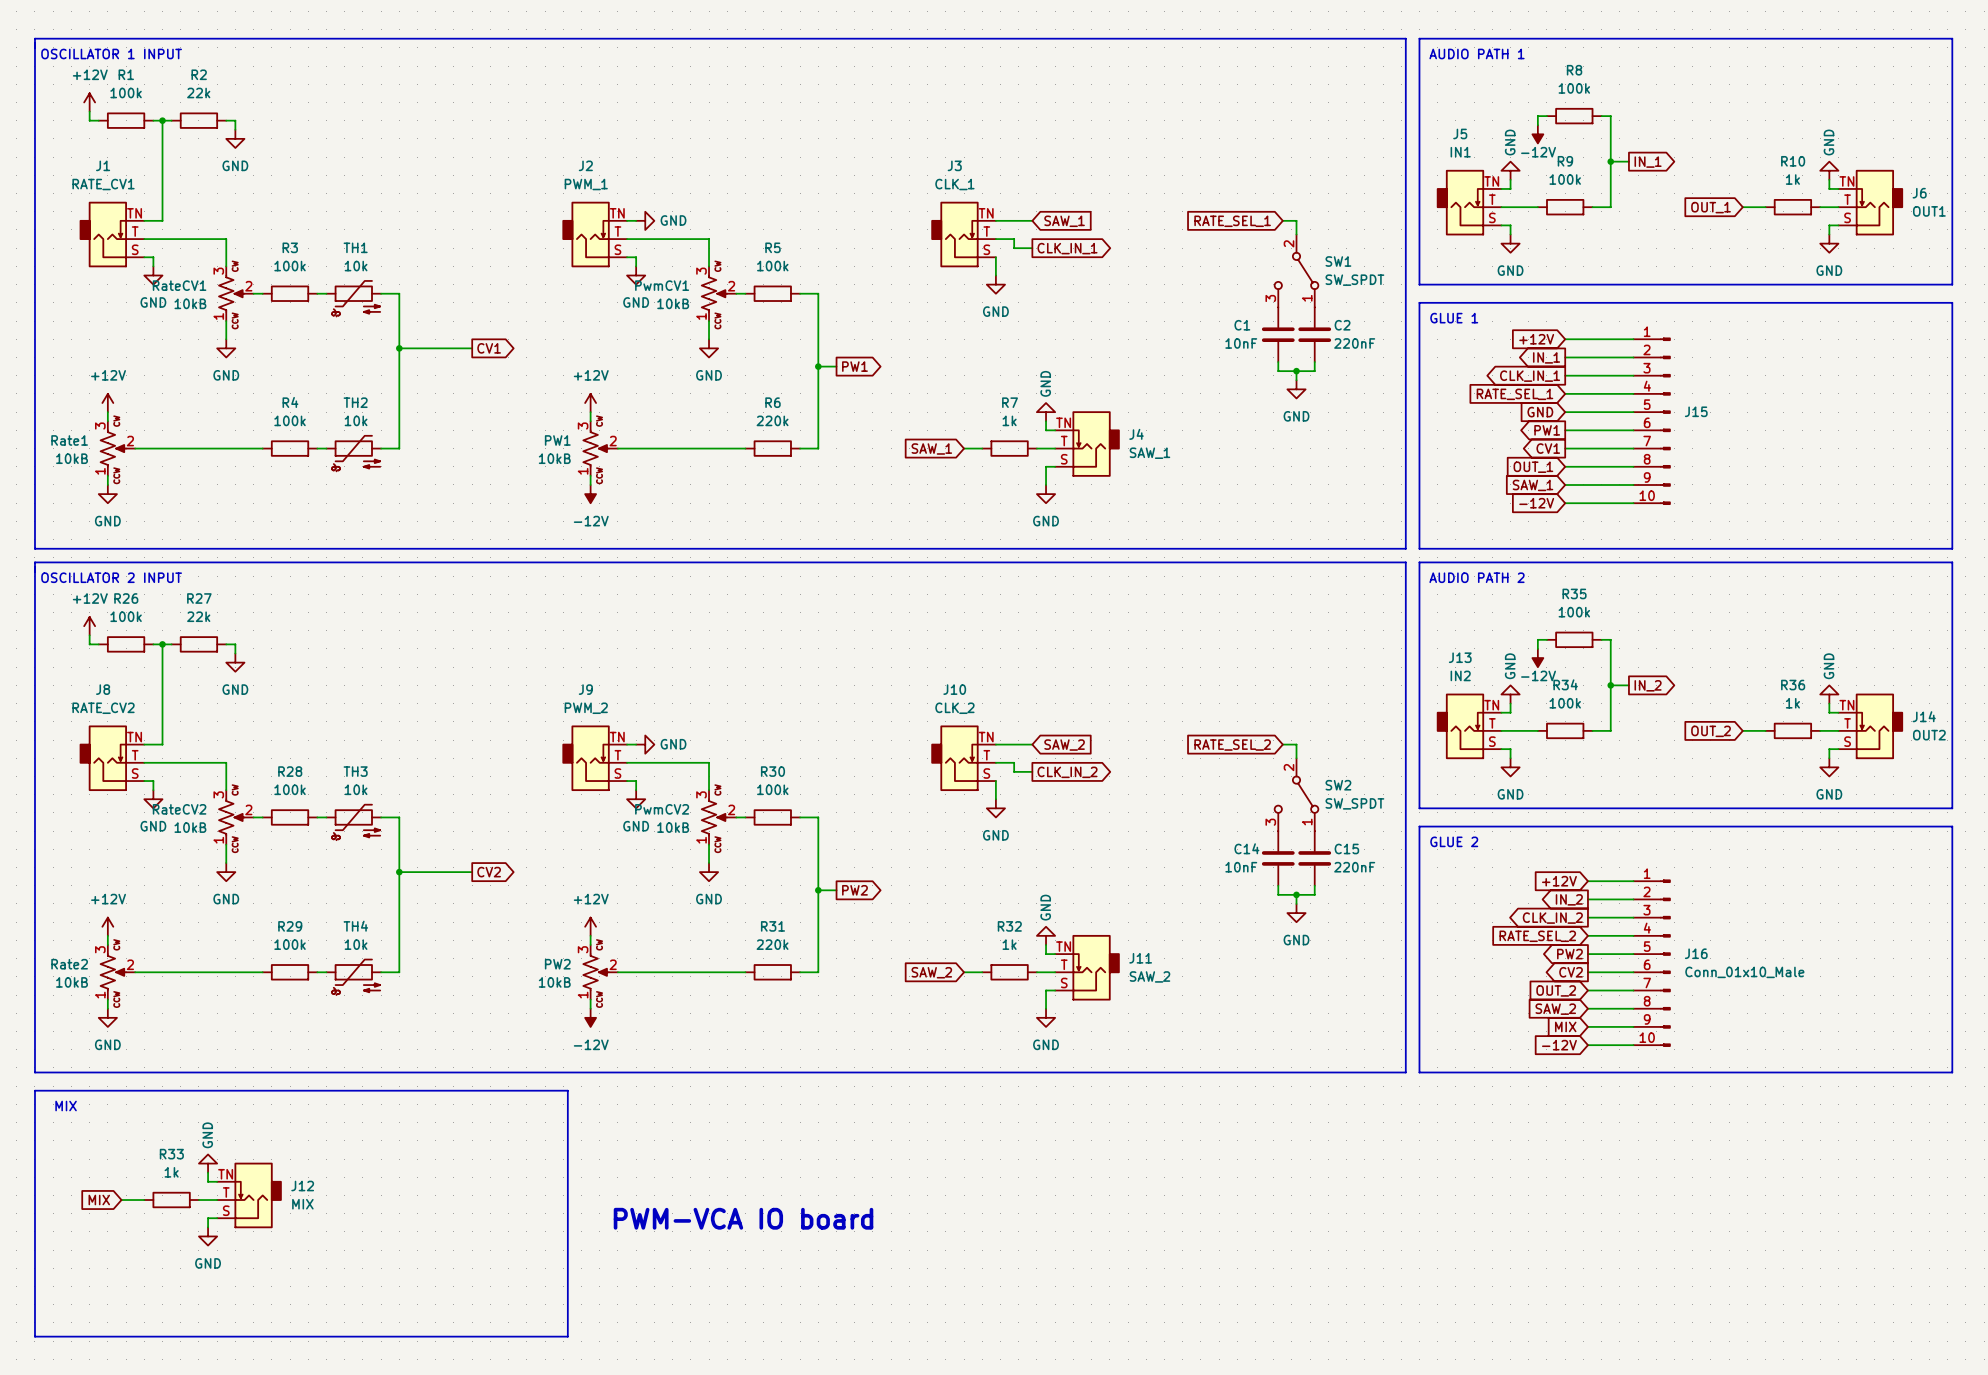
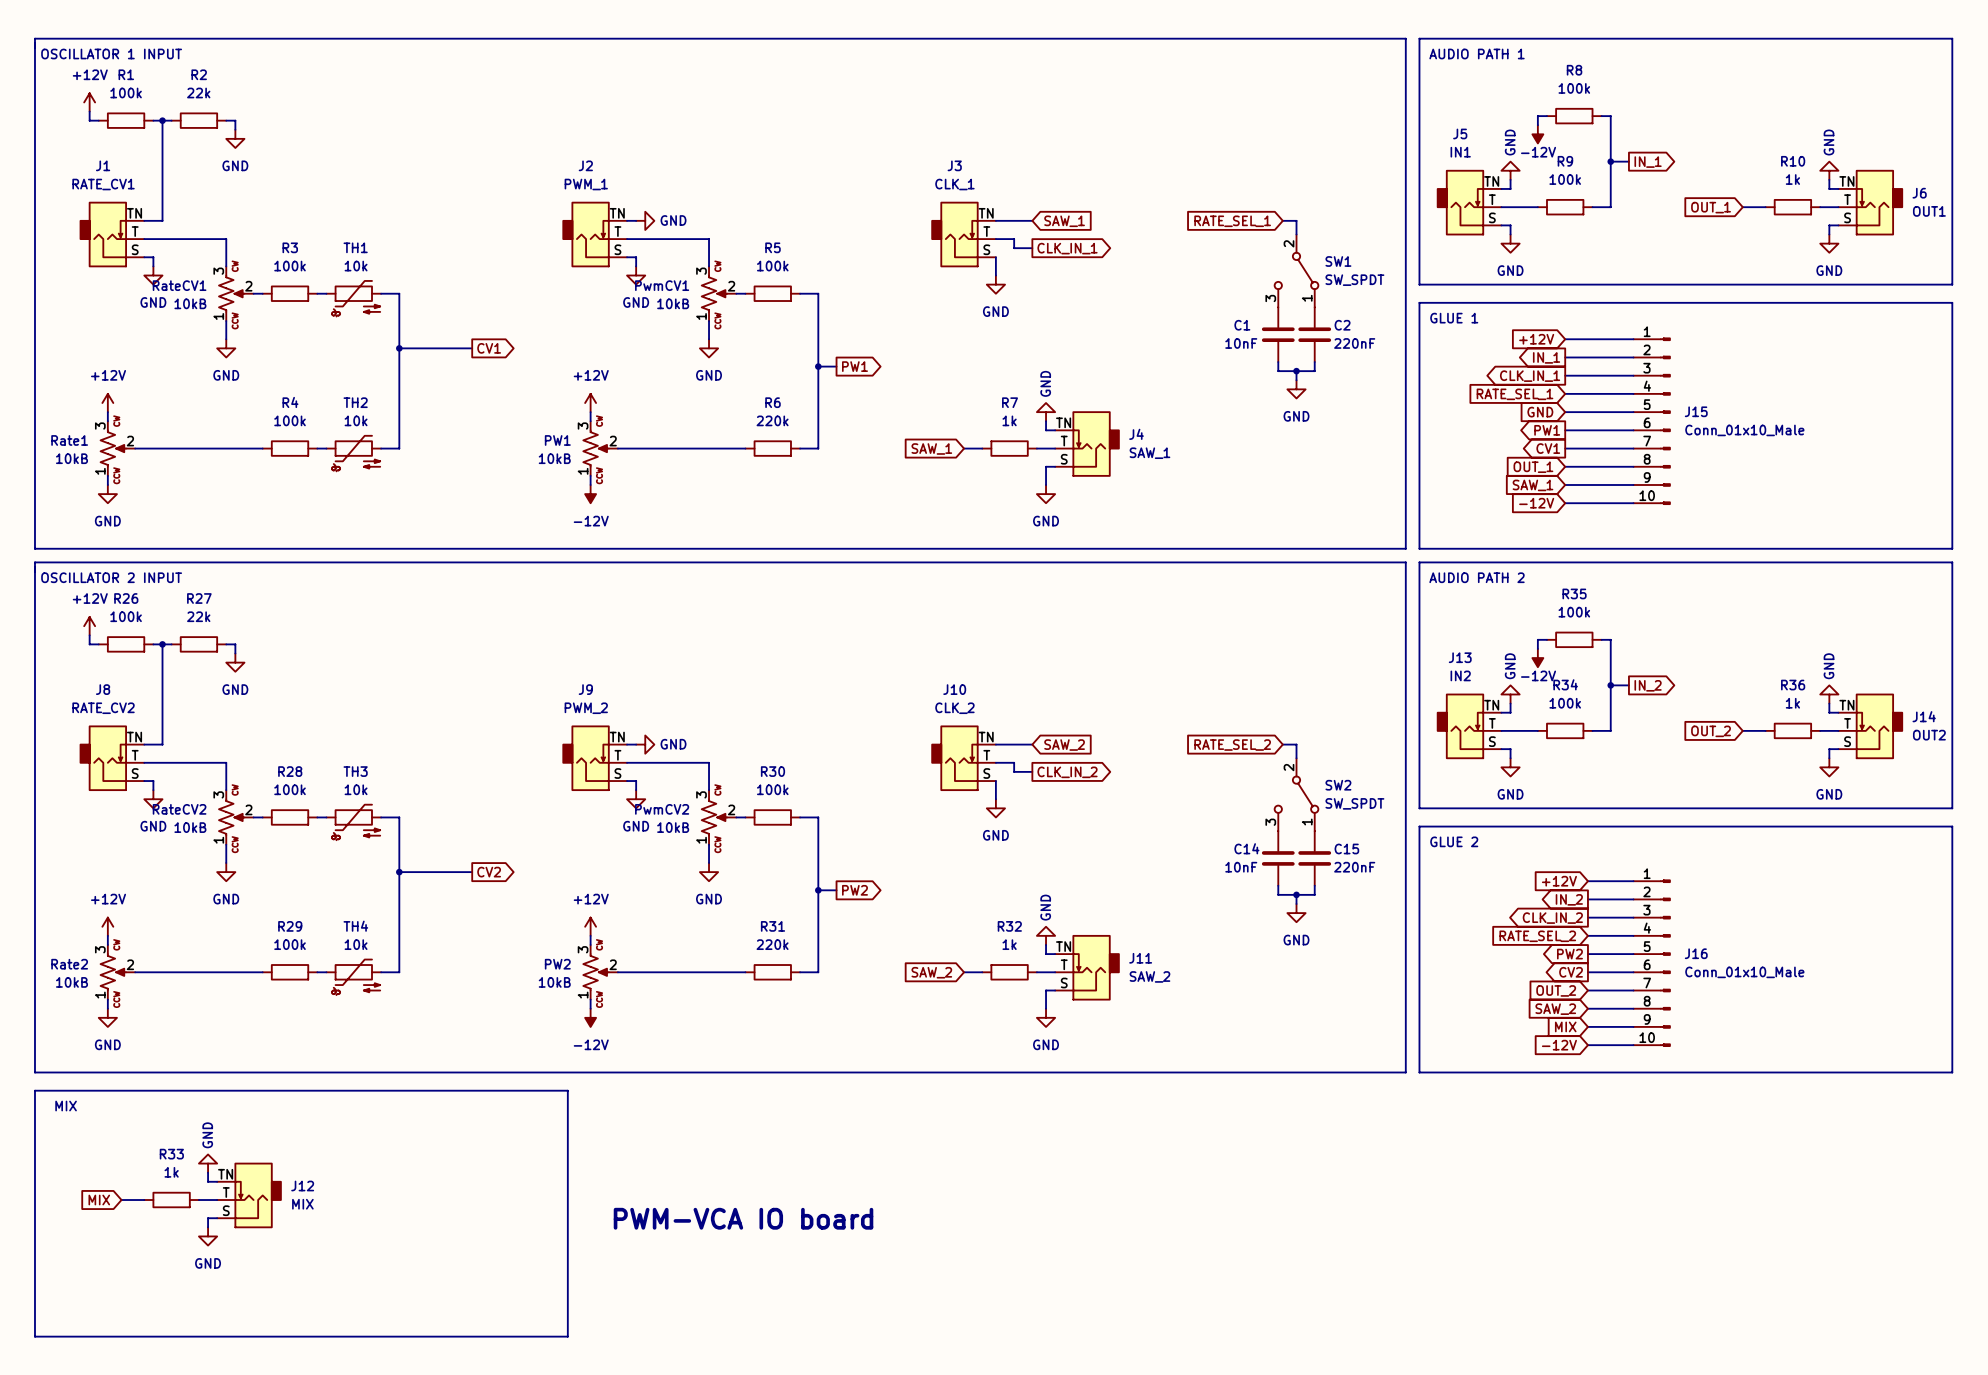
J15 value: none -> Conn_01x10_Male (1744, 430)

